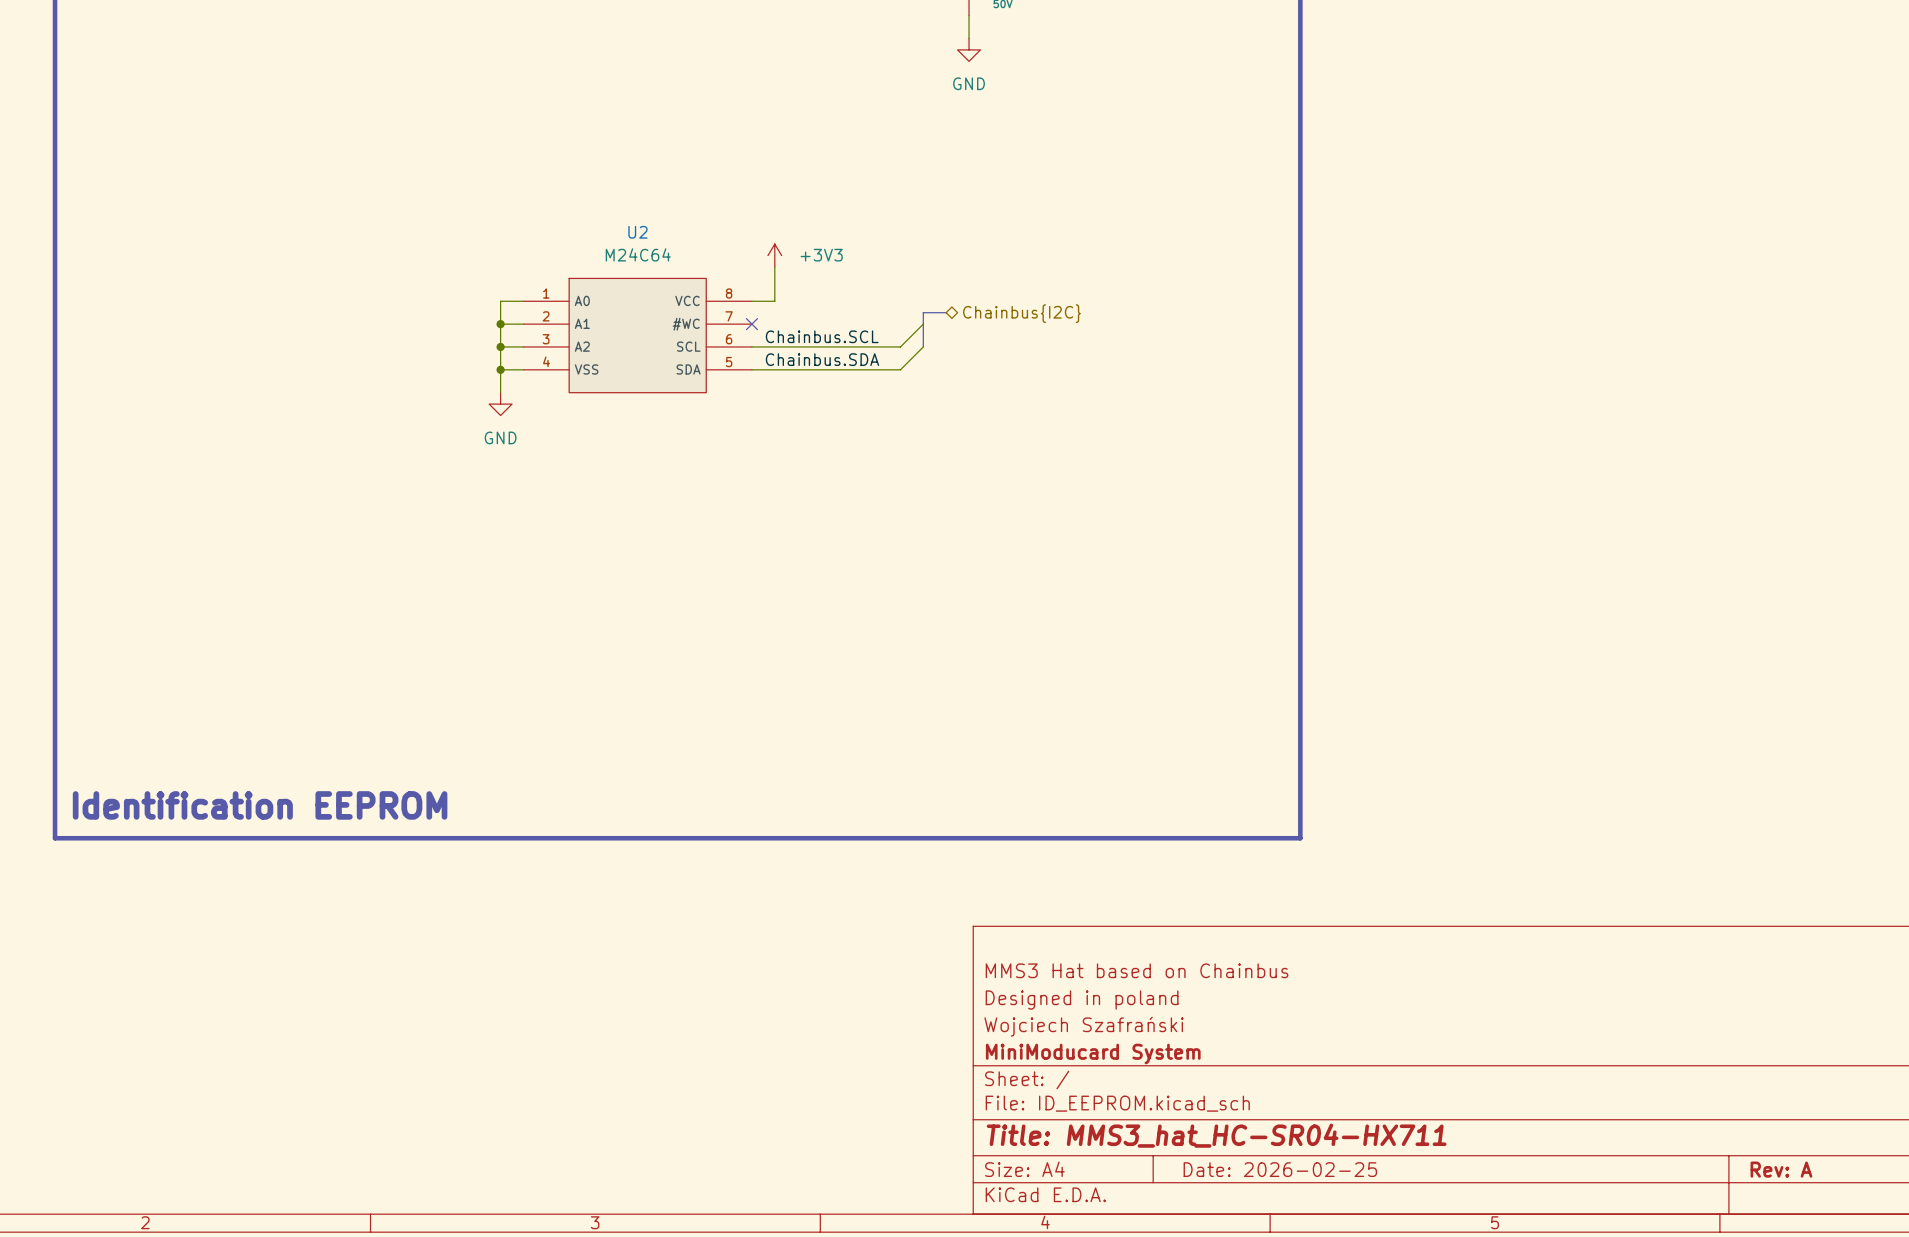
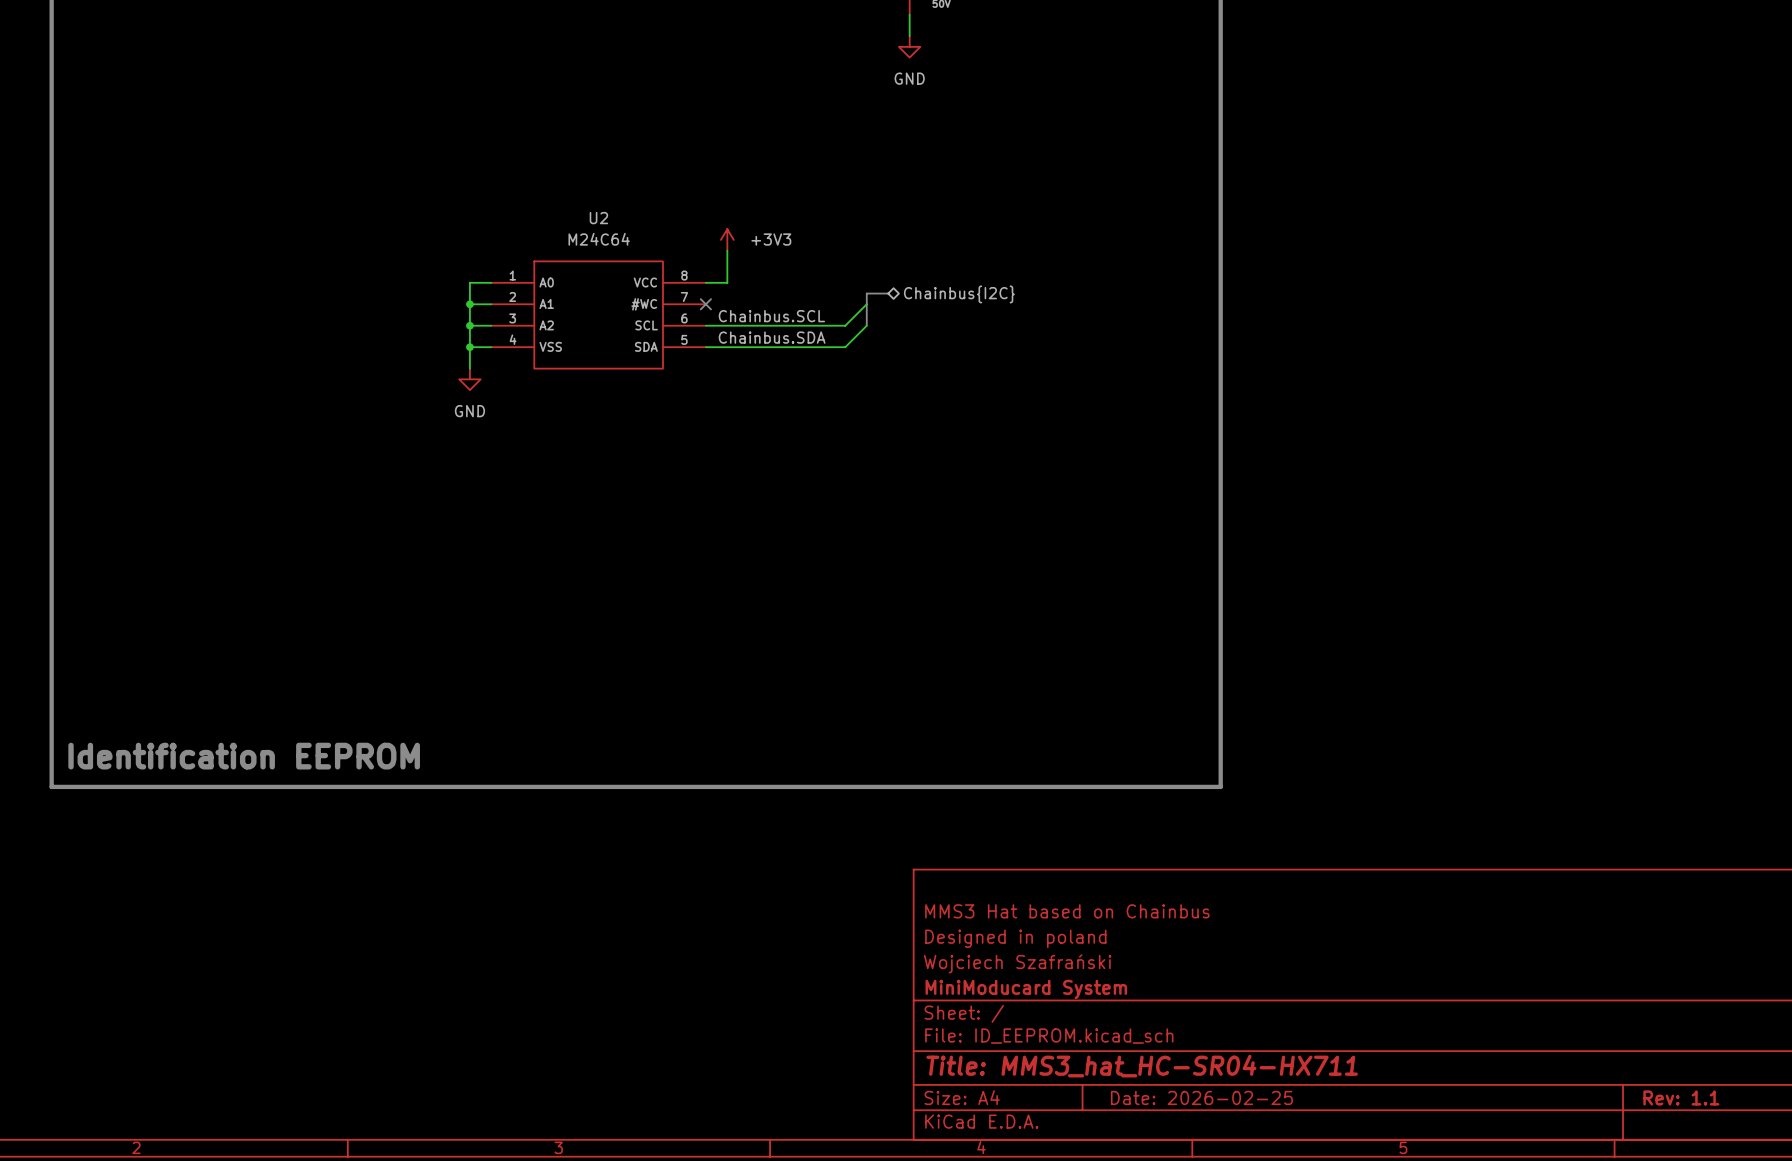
title block: Rev: A (1781, 1169) -> Rev: 1.1 (1681, 1097)

